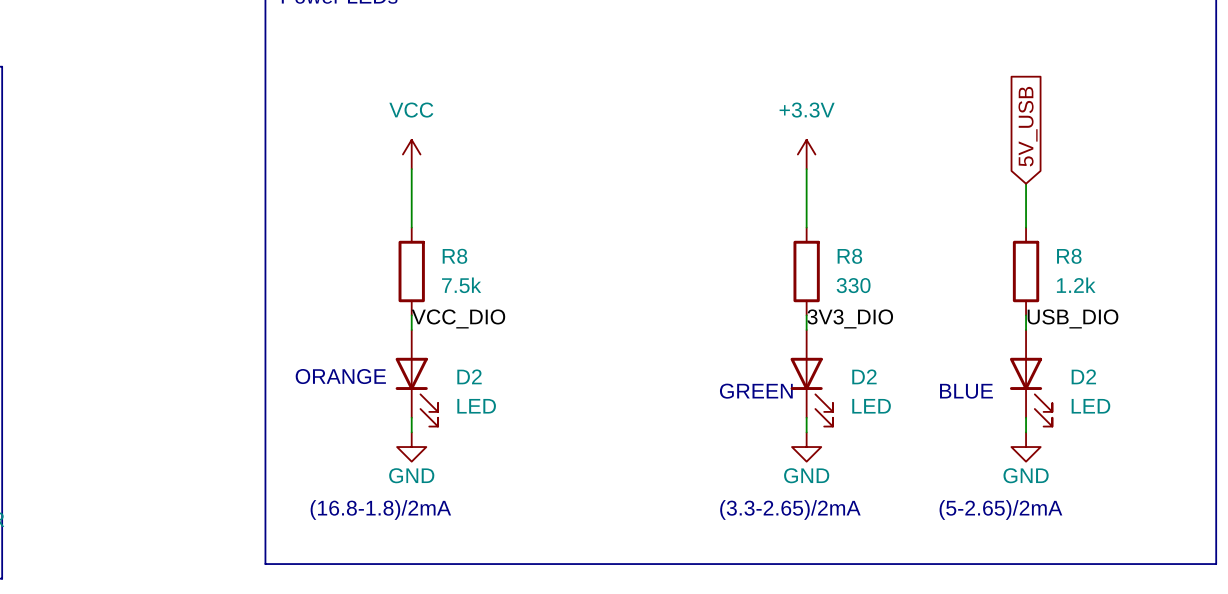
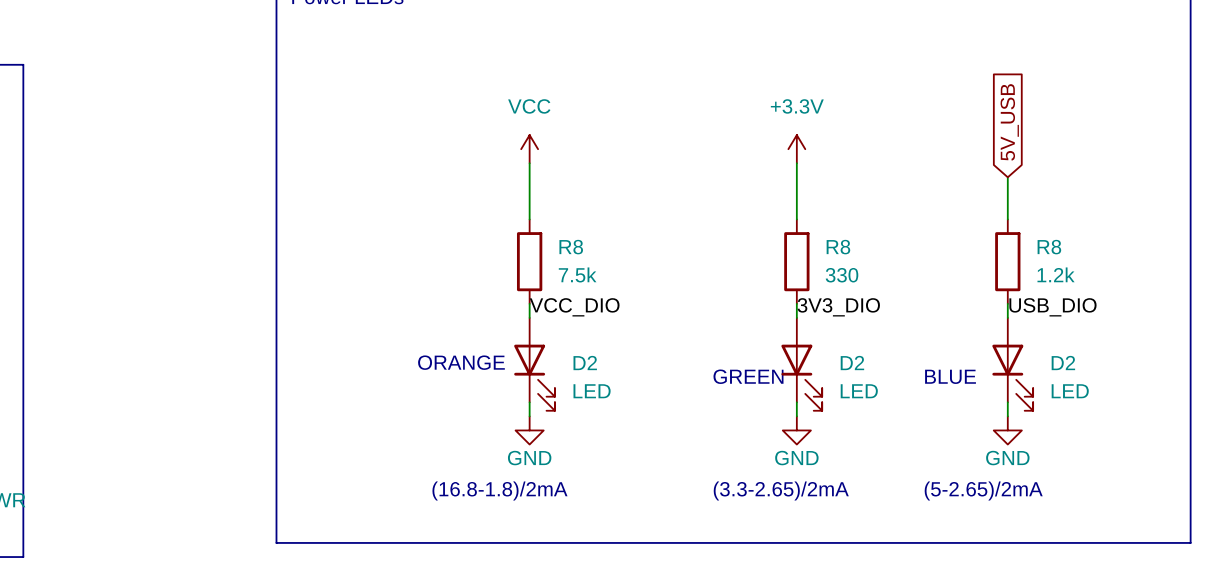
power symbol position: VCC (411, 154) -> VCC (529, 149)
wire: (411, 169) (411, 227) -> (529, 163) (529, 219)
R8 position: (411, 271) -> (529, 261)
wire: (411, 315) (411, 330) -> (529, 303) (529, 317)
label position: VCC_DIO (458, 318) -> VCC_DIO (574, 307)
text position: ORANGE (340, 376) -> ORANGE (461, 362)
D2 position: (416, 378) -> (534, 364)
wire: (411, 417) (411, 432) -> (529, 402) (529, 416)
power symbol position: GND (411, 447) -> GND (529, 430)
text position: (16.8-1.8)/2mA (380, 509) -> (16.8-1.8)/2mA (499, 490)

